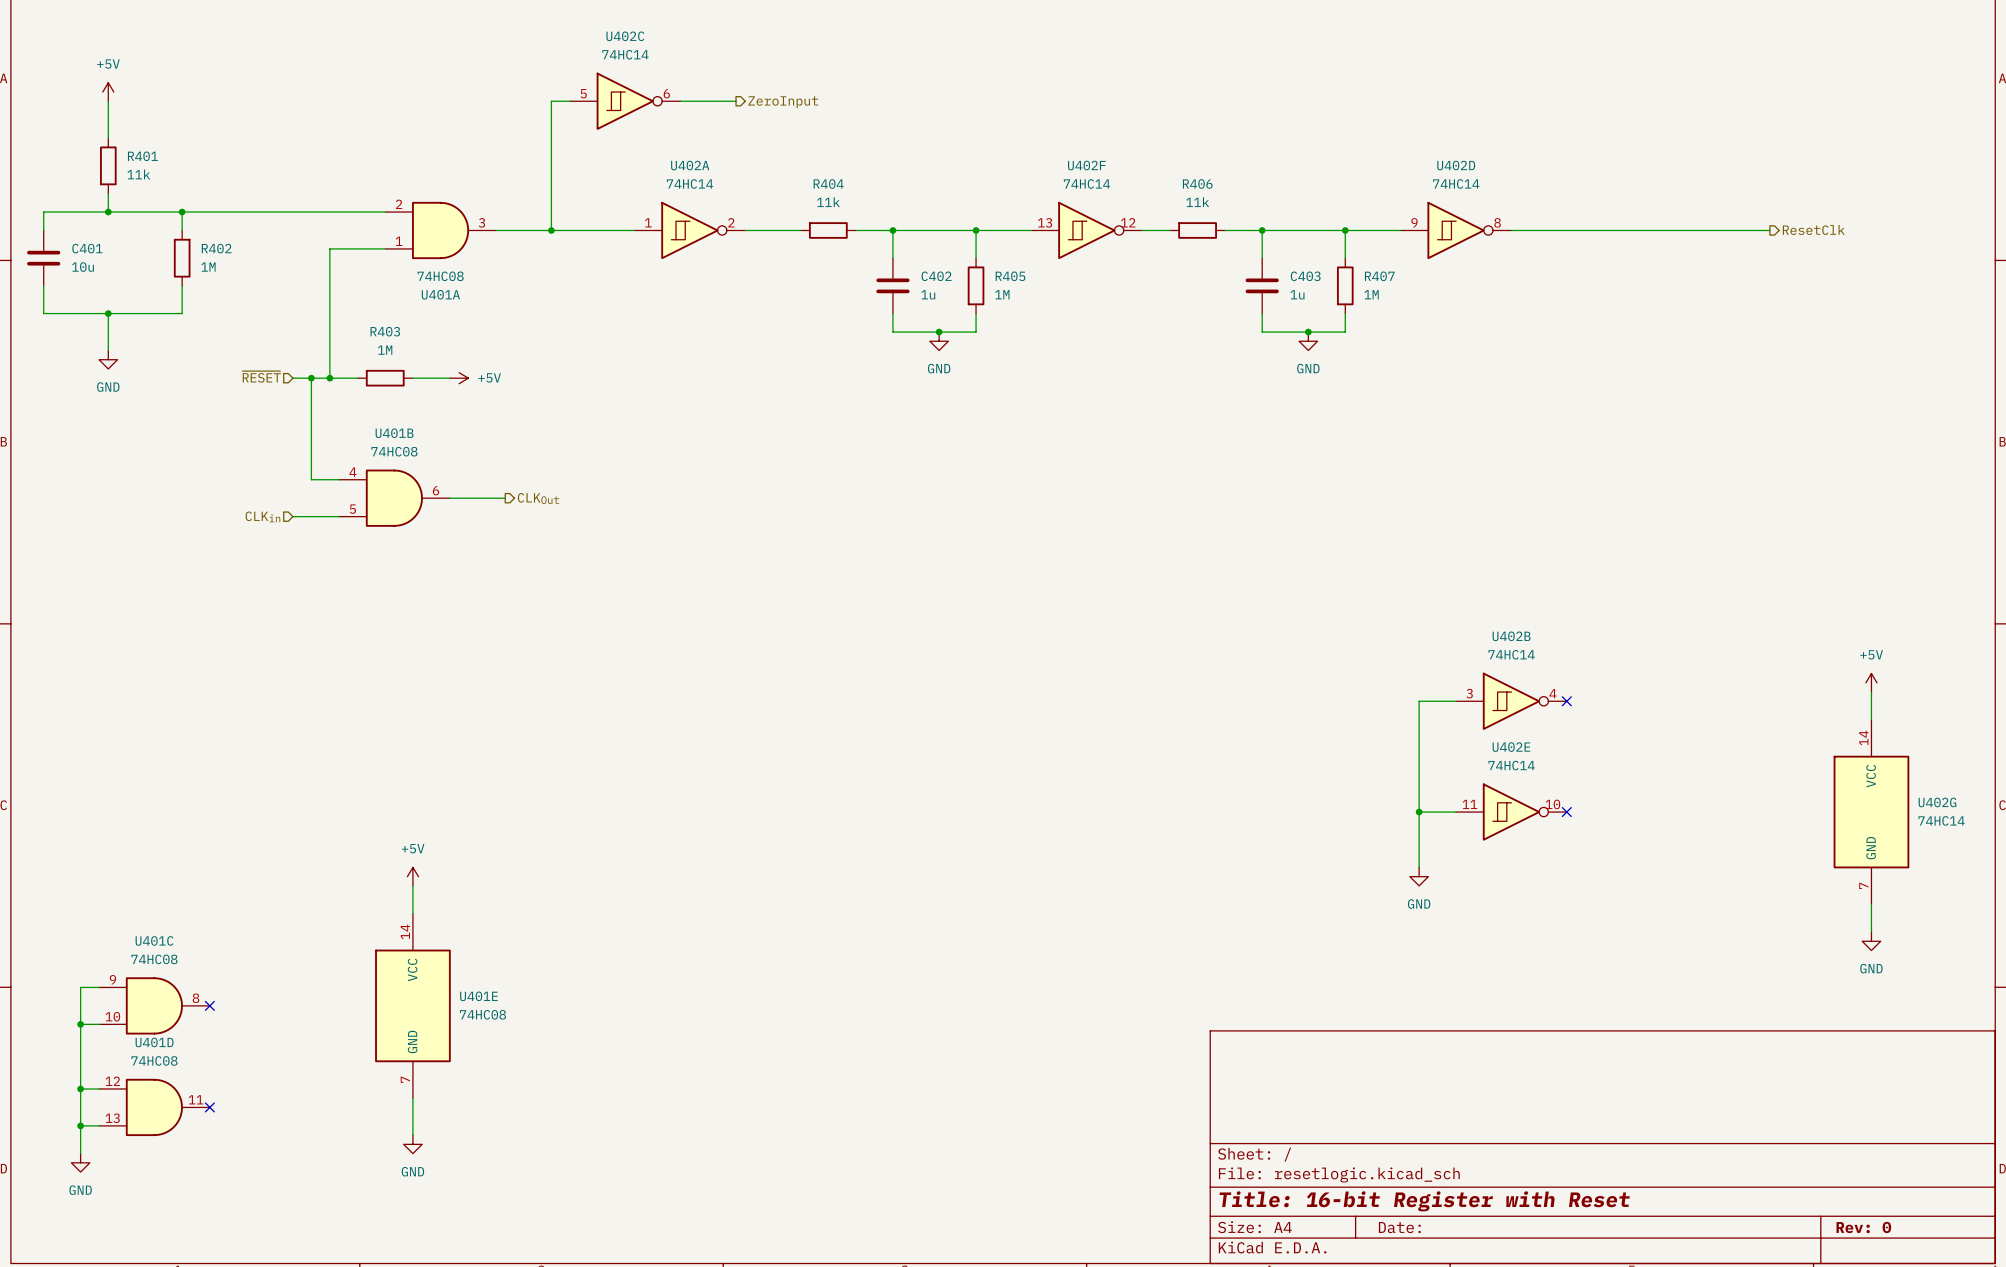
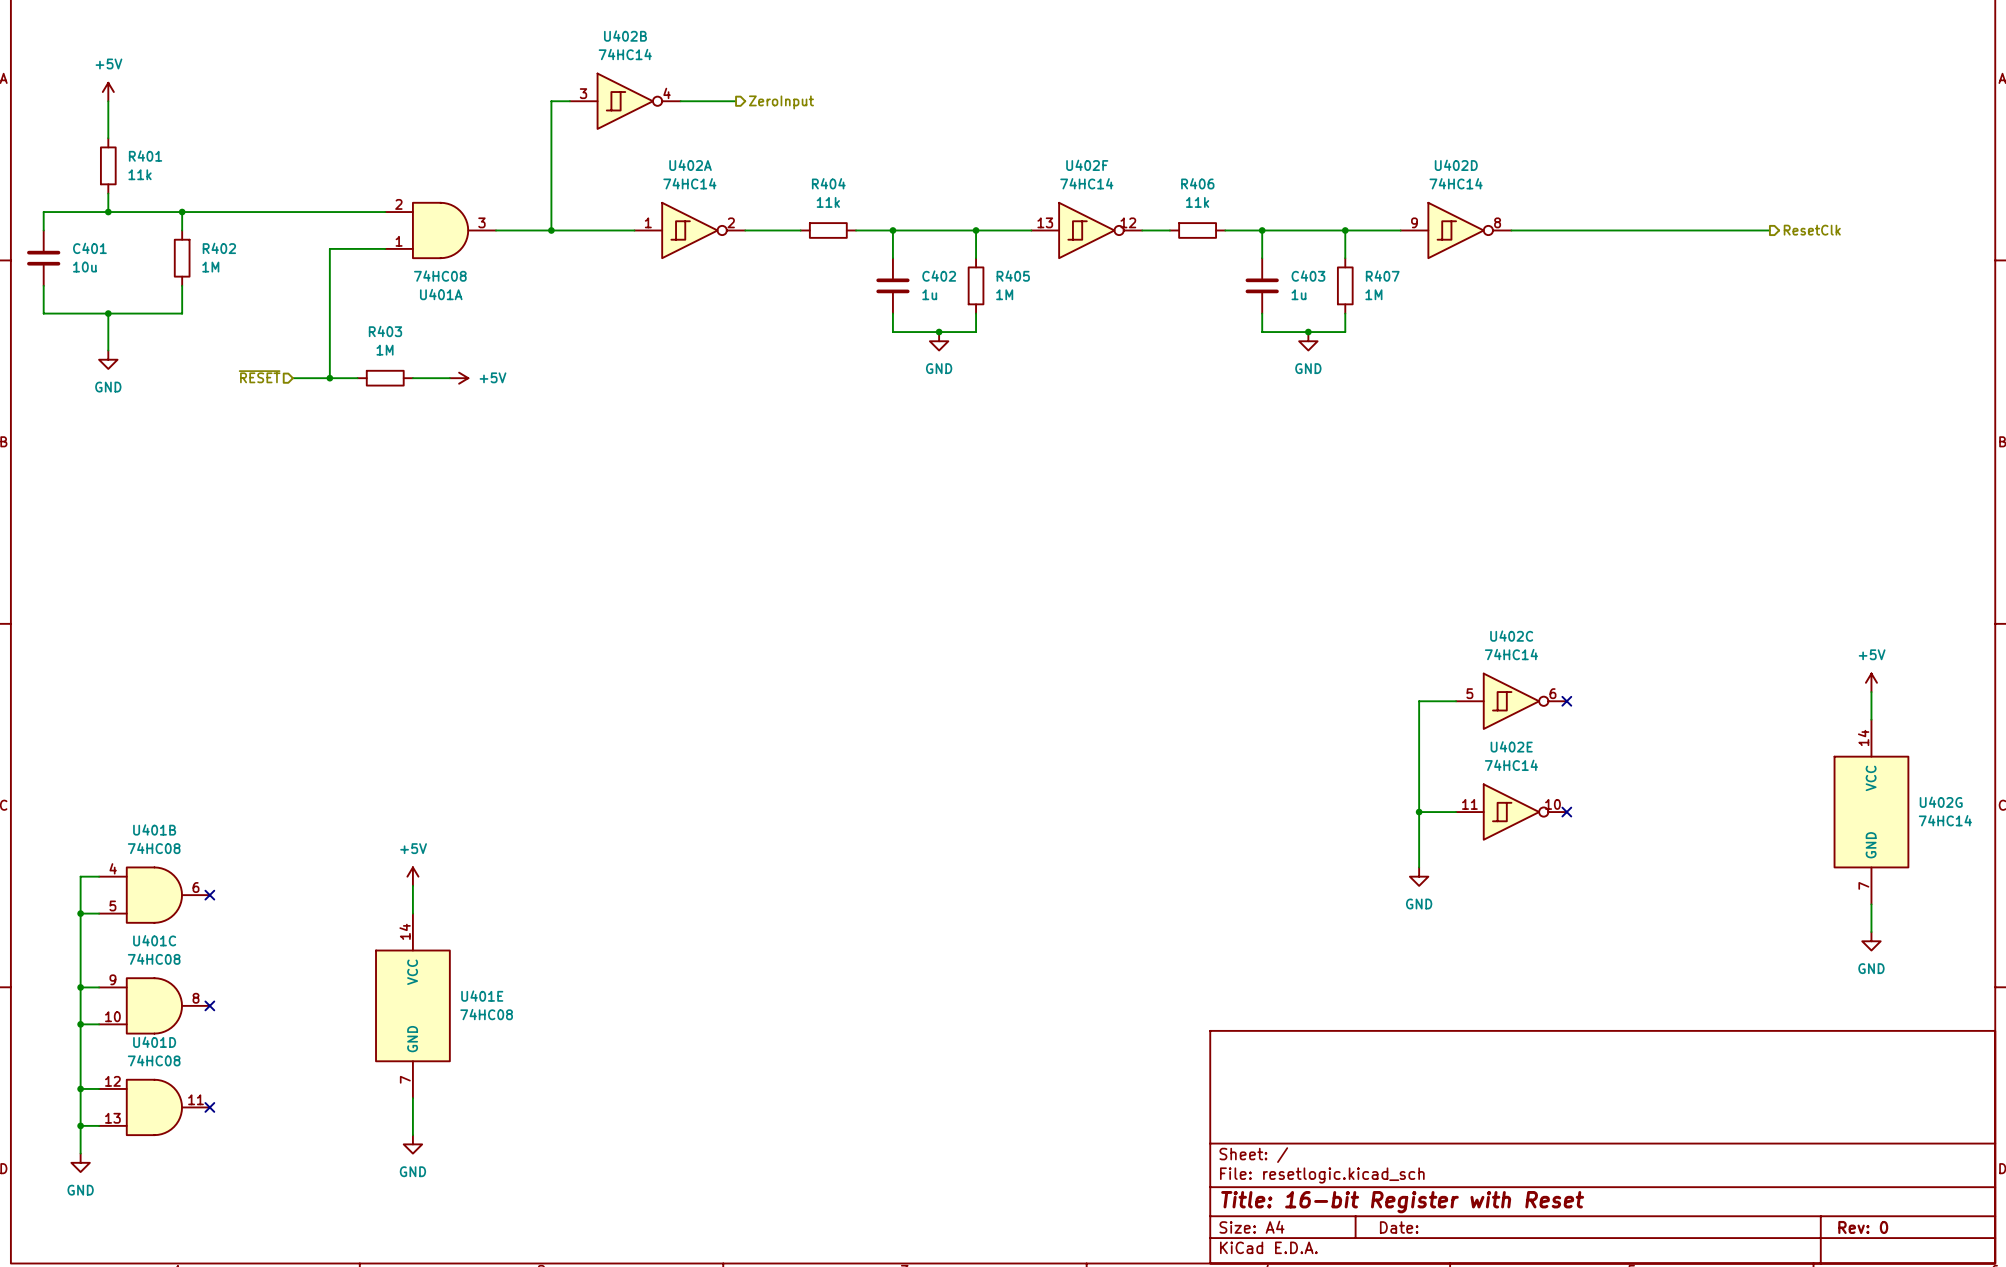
U402C position: (625, 101) -> (1511, 701)
wire: (311, 378) (311, 479) (339, 479) -> none
junction: (311, 378) -> none
U401B position: (394, 498) -> (154, 895)
wire: (449, 498) (505, 498) -> none
hierarchical label: CLKOut (538, 498) -> none
hierarchical label: CLKin (262, 516) -> none
wire: (292, 516) (339, 516) -> none
U402B position: (1511, 701) -> (625, 101)
wire: none -> (99, 876) (80, 876) (80, 987)
no-connect mark: none -> (209, 895)
wire: none -> (80, 913) (99, 913)
junction: none -> (80, 913)
junction: none -> (80, 987)

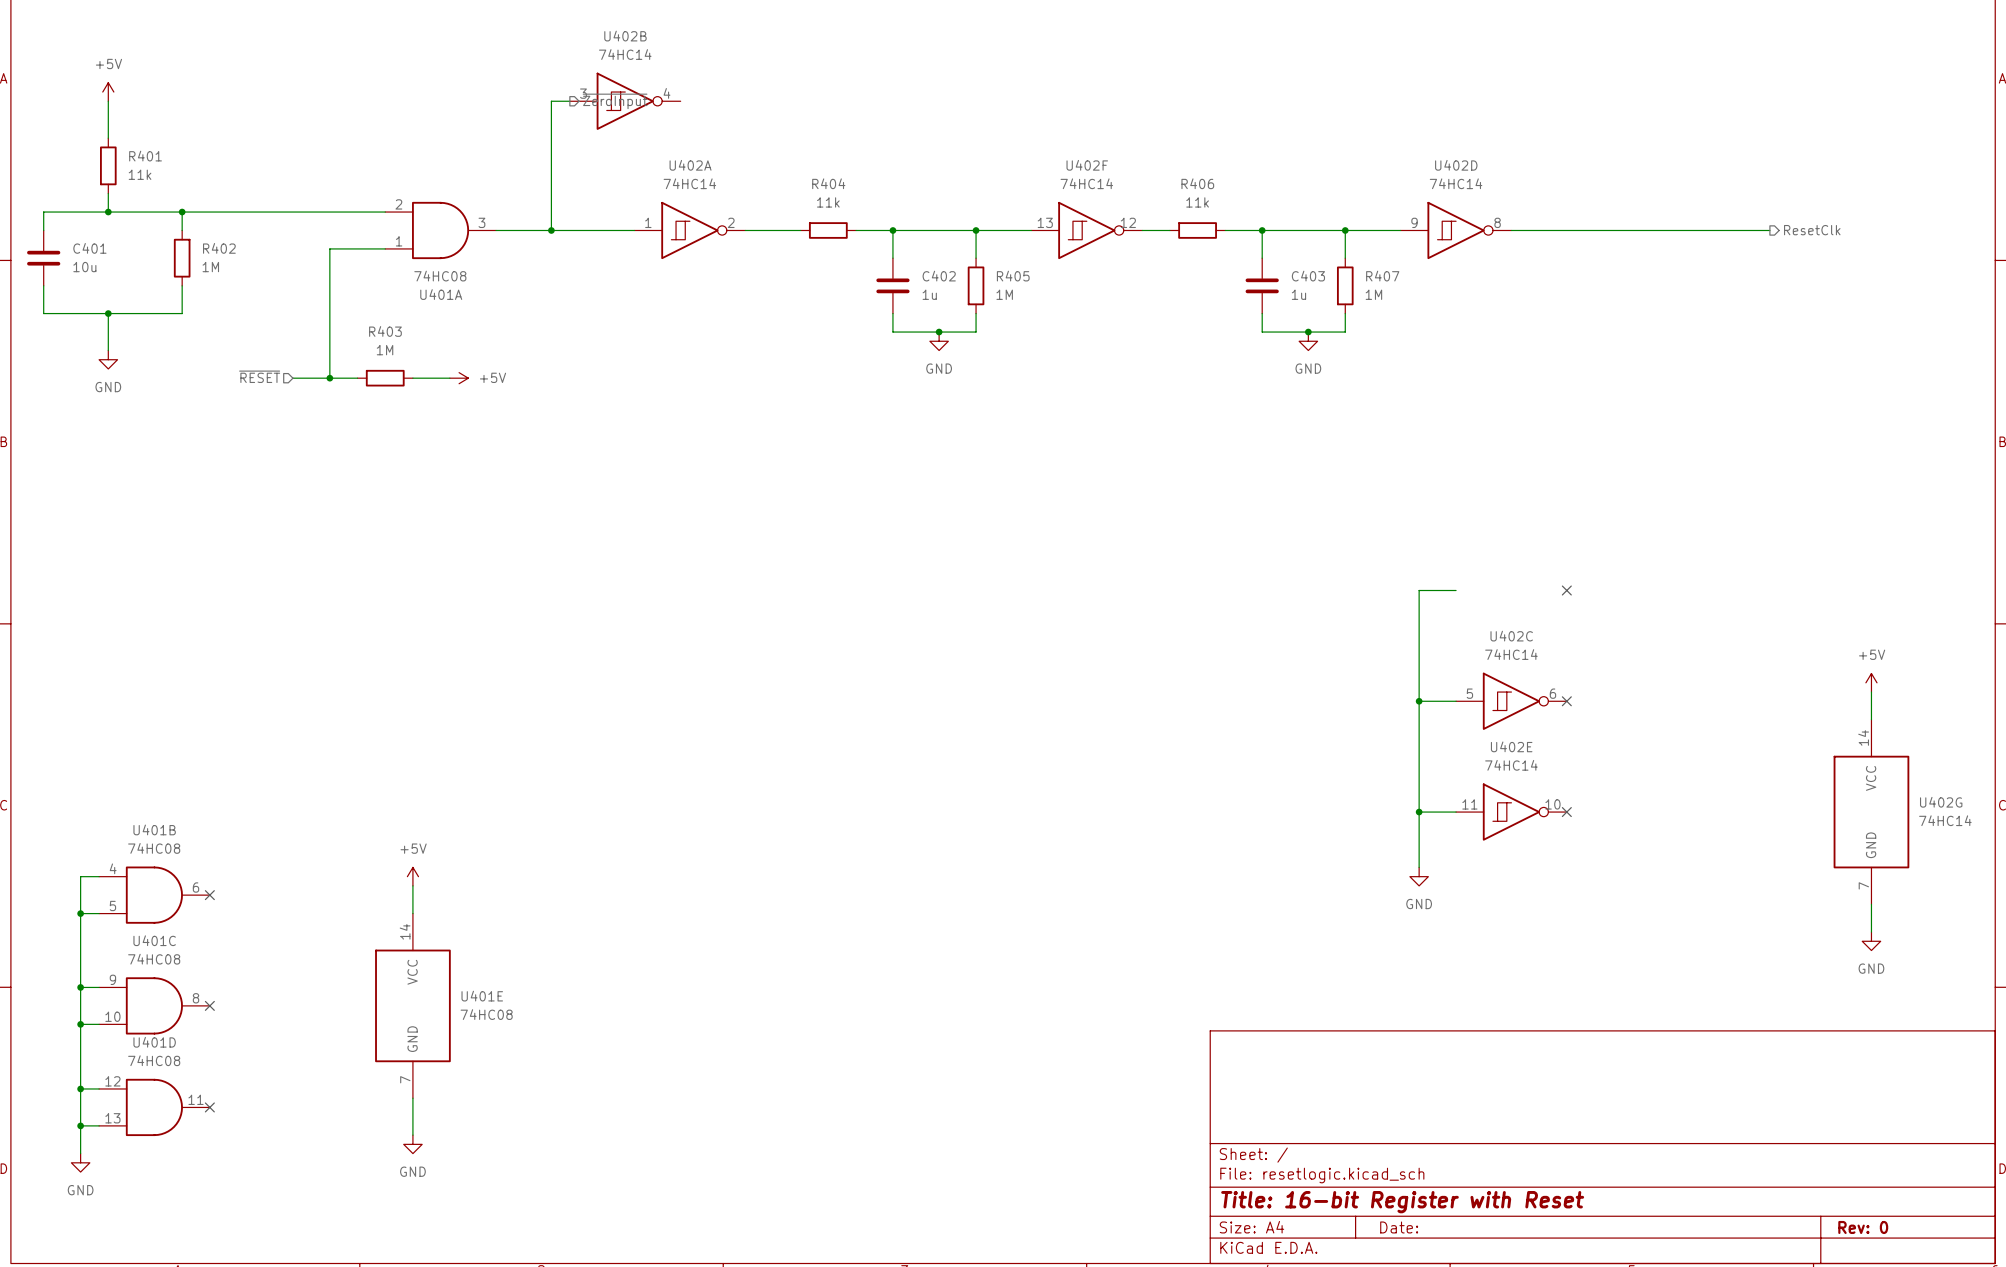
hierarchical label: none -> ~{ZeroInput} (615, 101)
wire: (680, 101) (736, 101) -> none
hierarchical label: ZeroInput (781, 102) -> none
wire: none -> (1456, 590) (1419, 590) (1419, 701)
no-connect mark: none -> (1566, 590)
junction: none -> (1419, 701)

